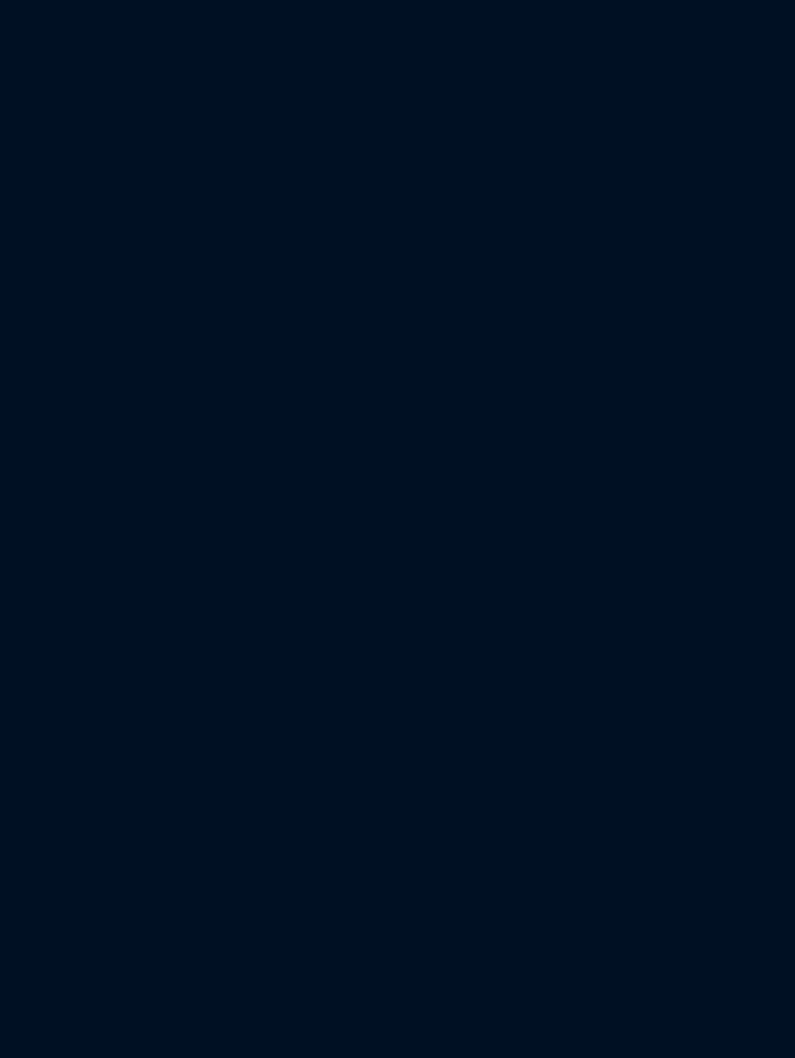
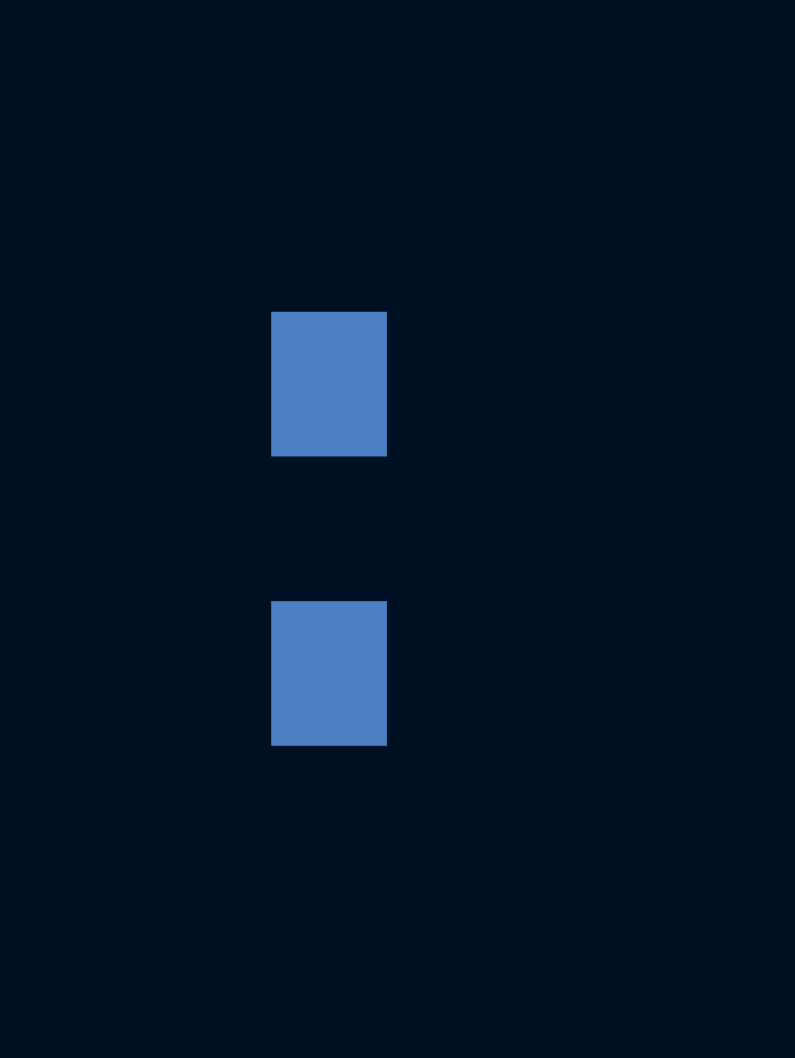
part: none -> (329, 528)

